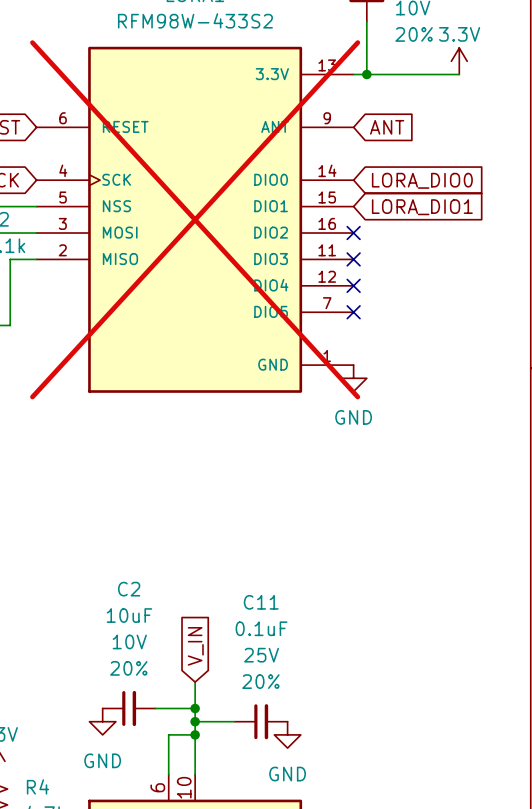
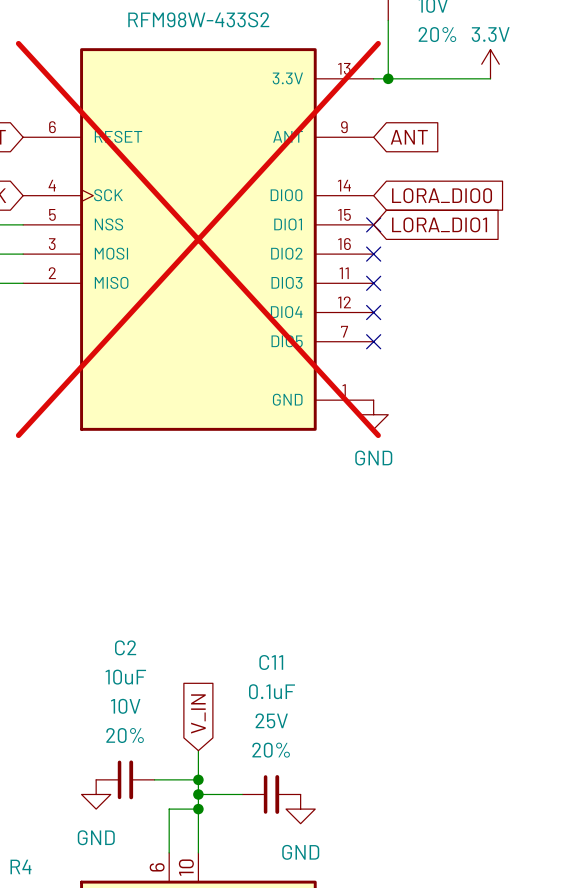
no-connect mark: none -> (373, 224)

